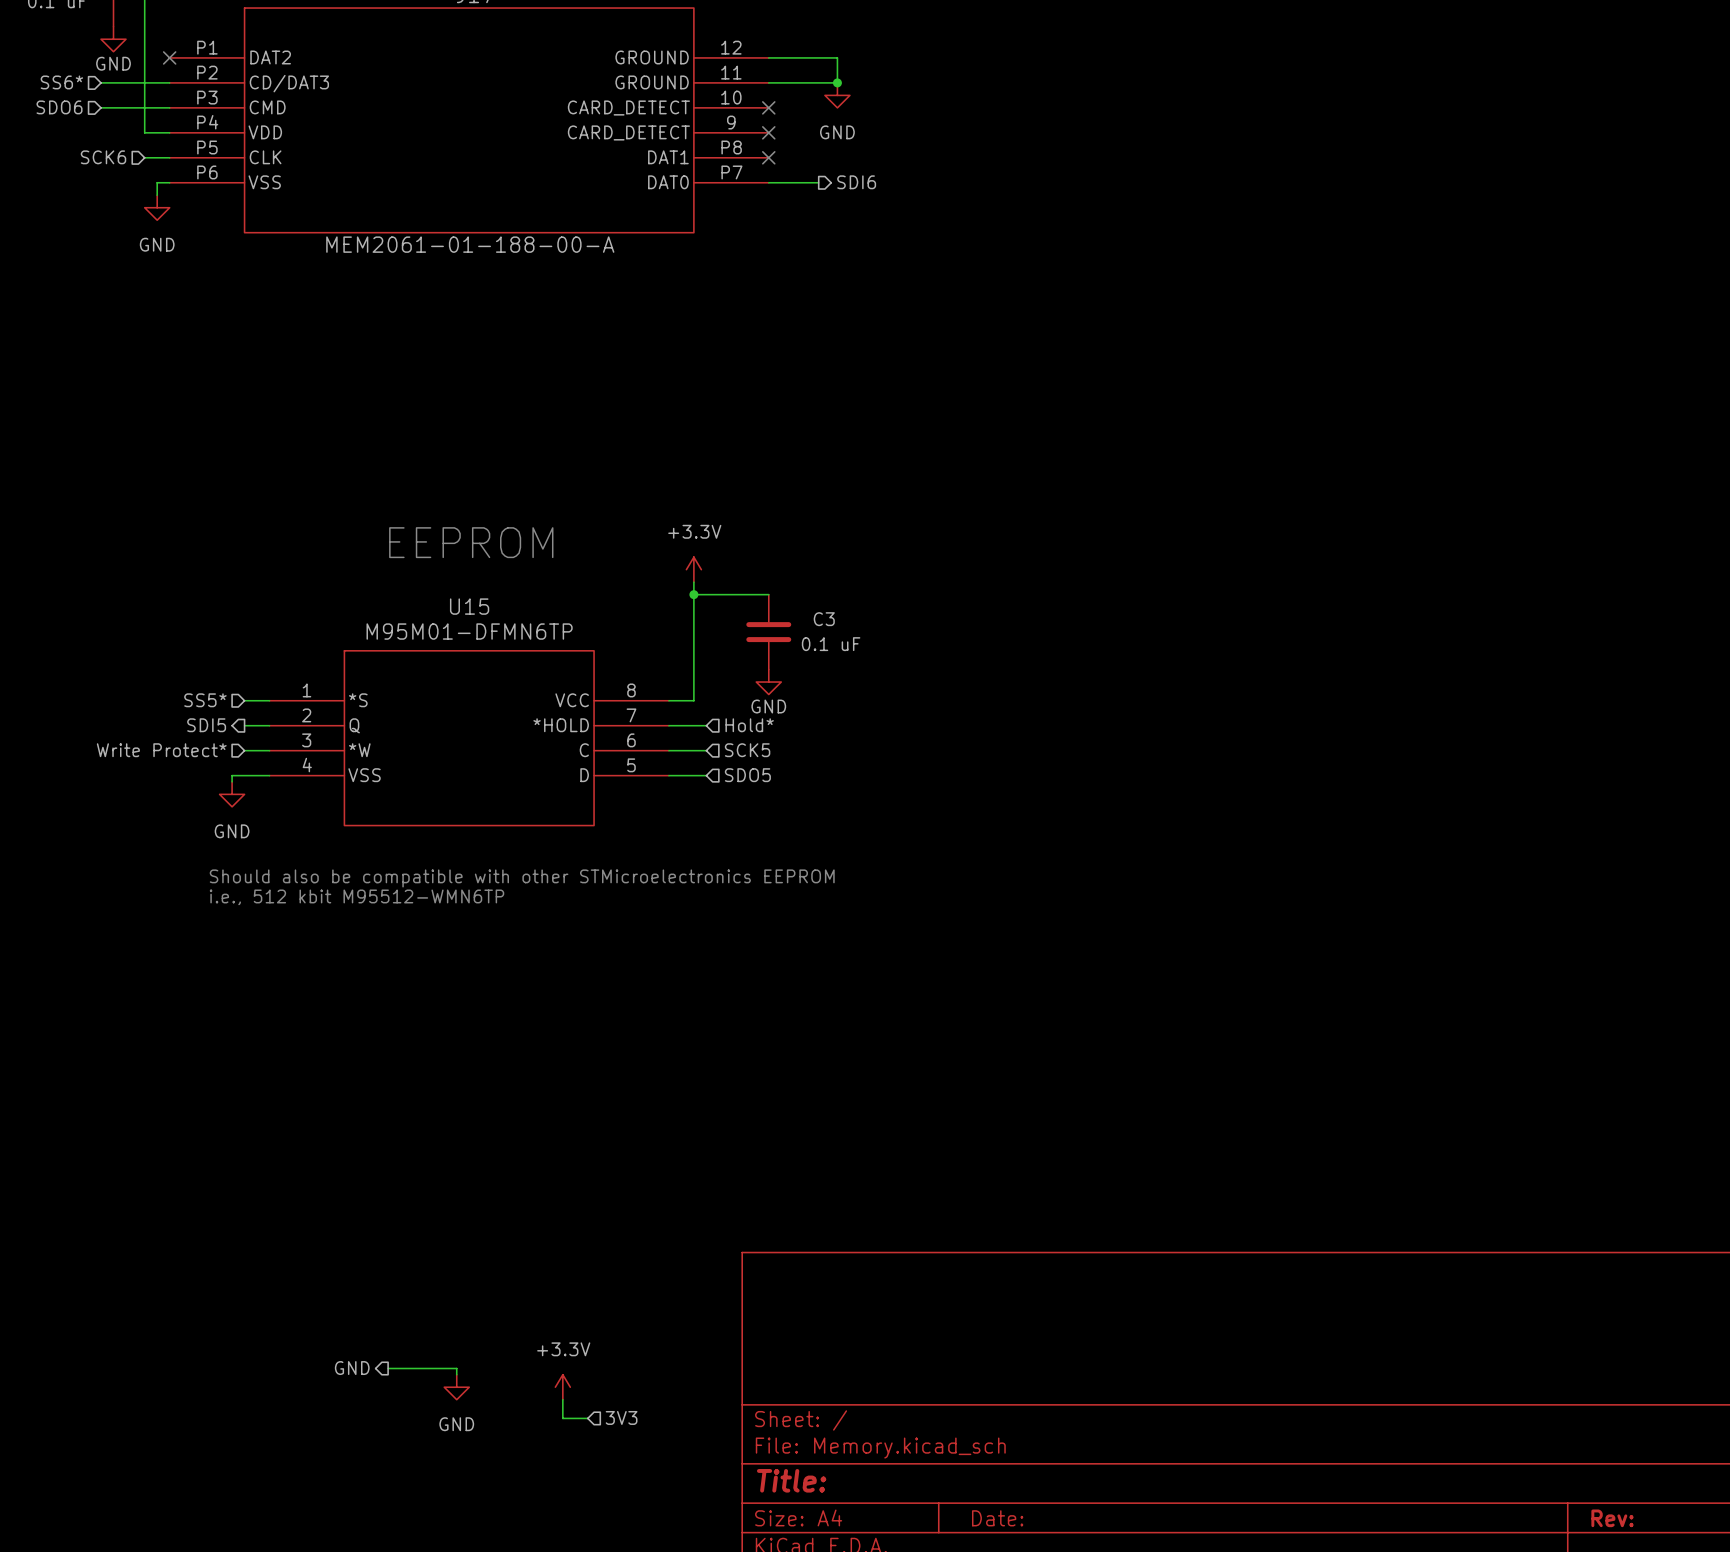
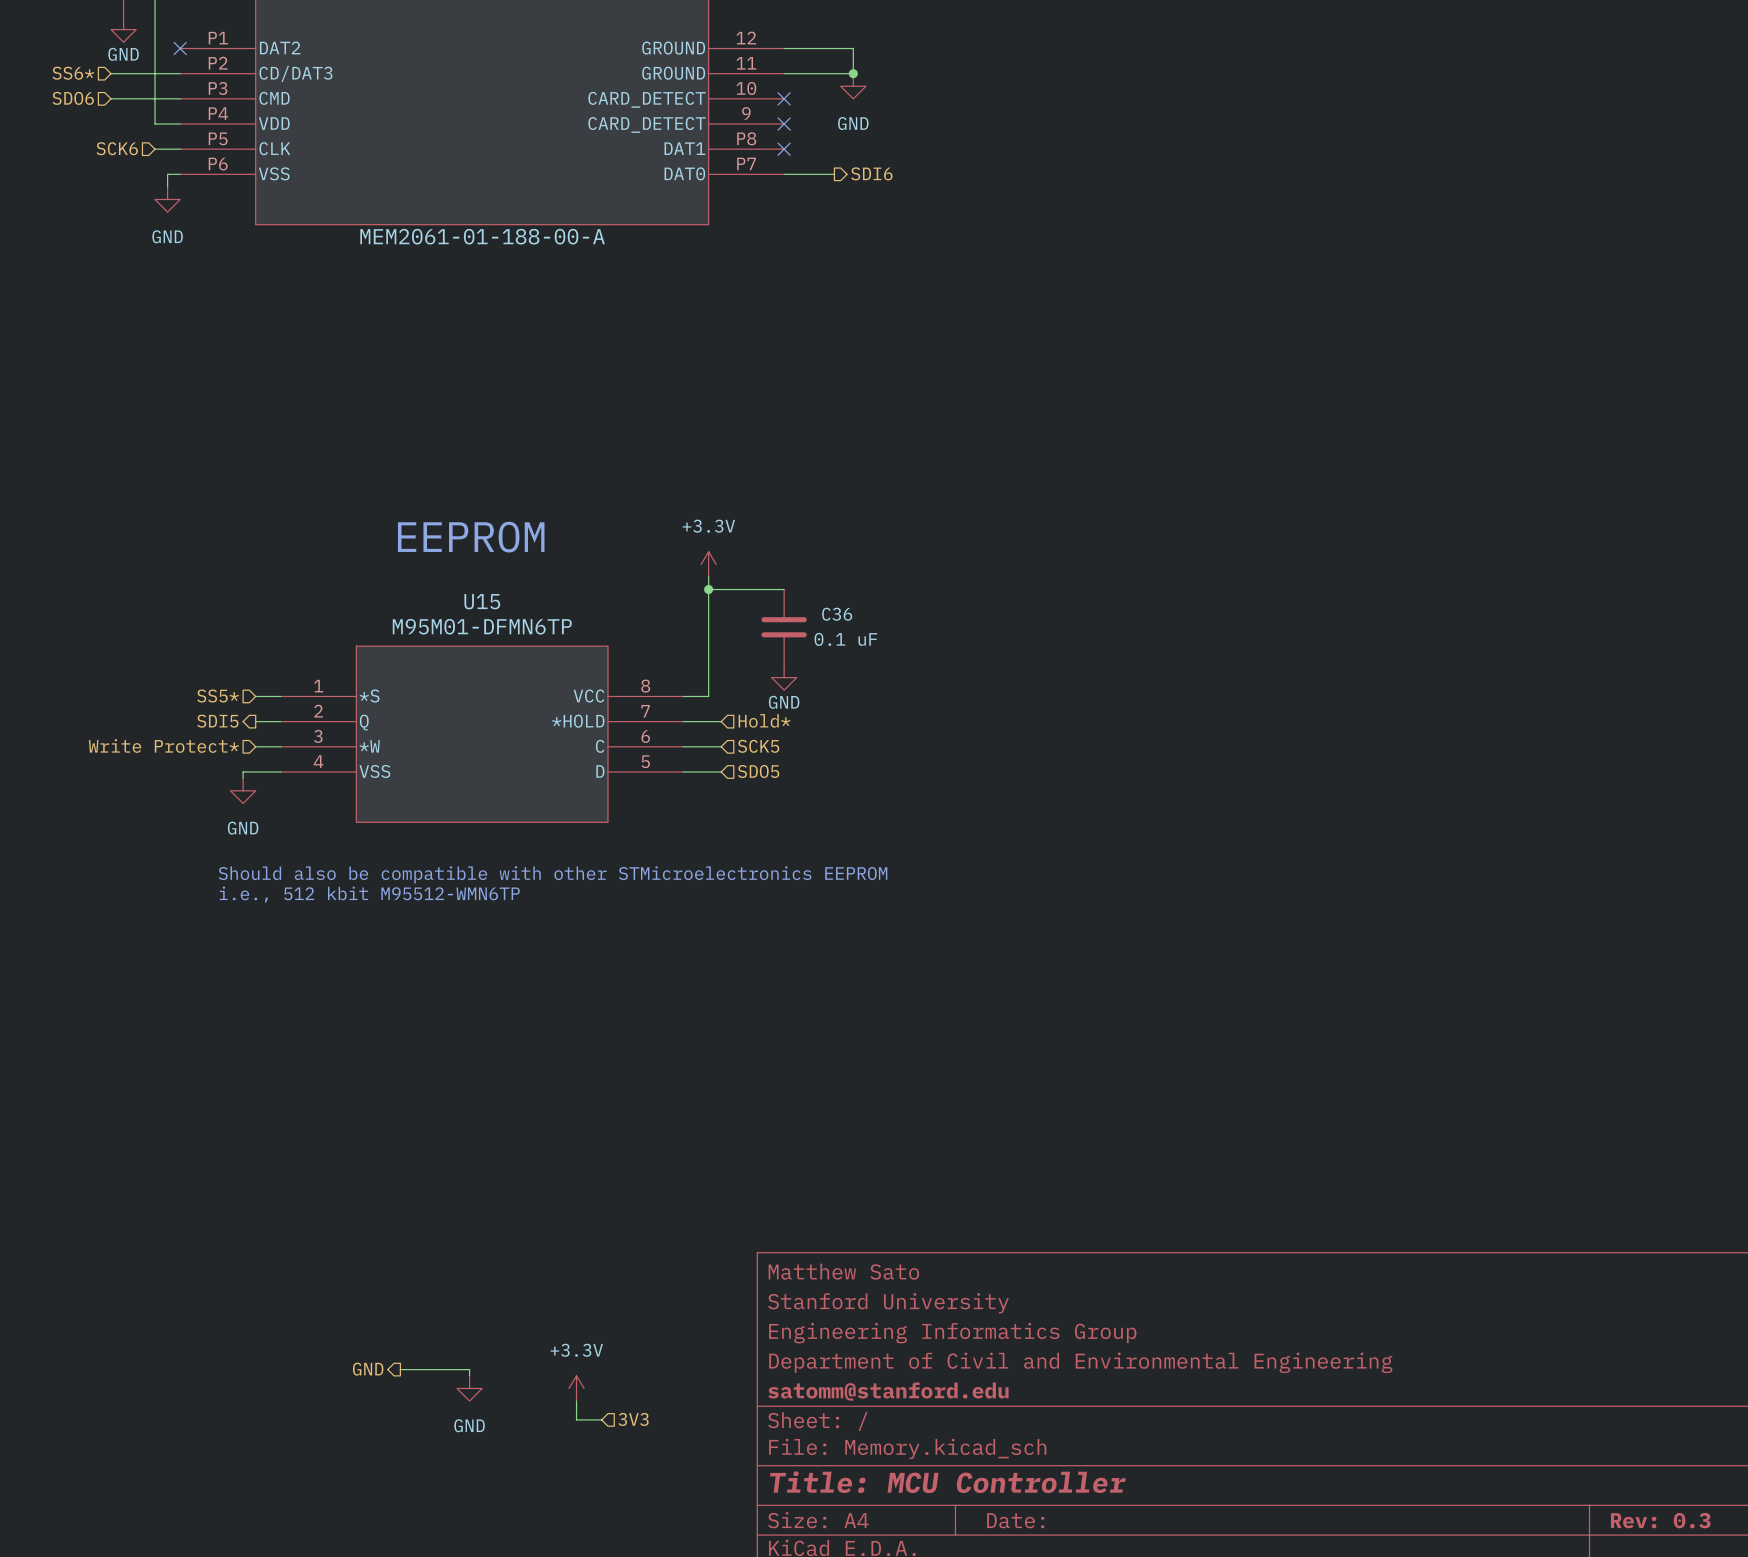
C3 name: C3 (824, 619) -> C36 (837, 614)
title block: none -> Matthew Sato (843, 1271)
title block: none -> Stanford University (888, 1303)
title block: none -> Engineering Informatics Group (952, 1333)
title block: none -> Department of Civil and Environmental Engineering (1080, 1362)
title block: none -> satomm@stanford.edu (888, 1391)
title block: Title: (791, 1480) -> Title: MCU Controller (947, 1482)
title block: Rev: (1612, 1518) -> Rev: 0.3 (1660, 1520)

